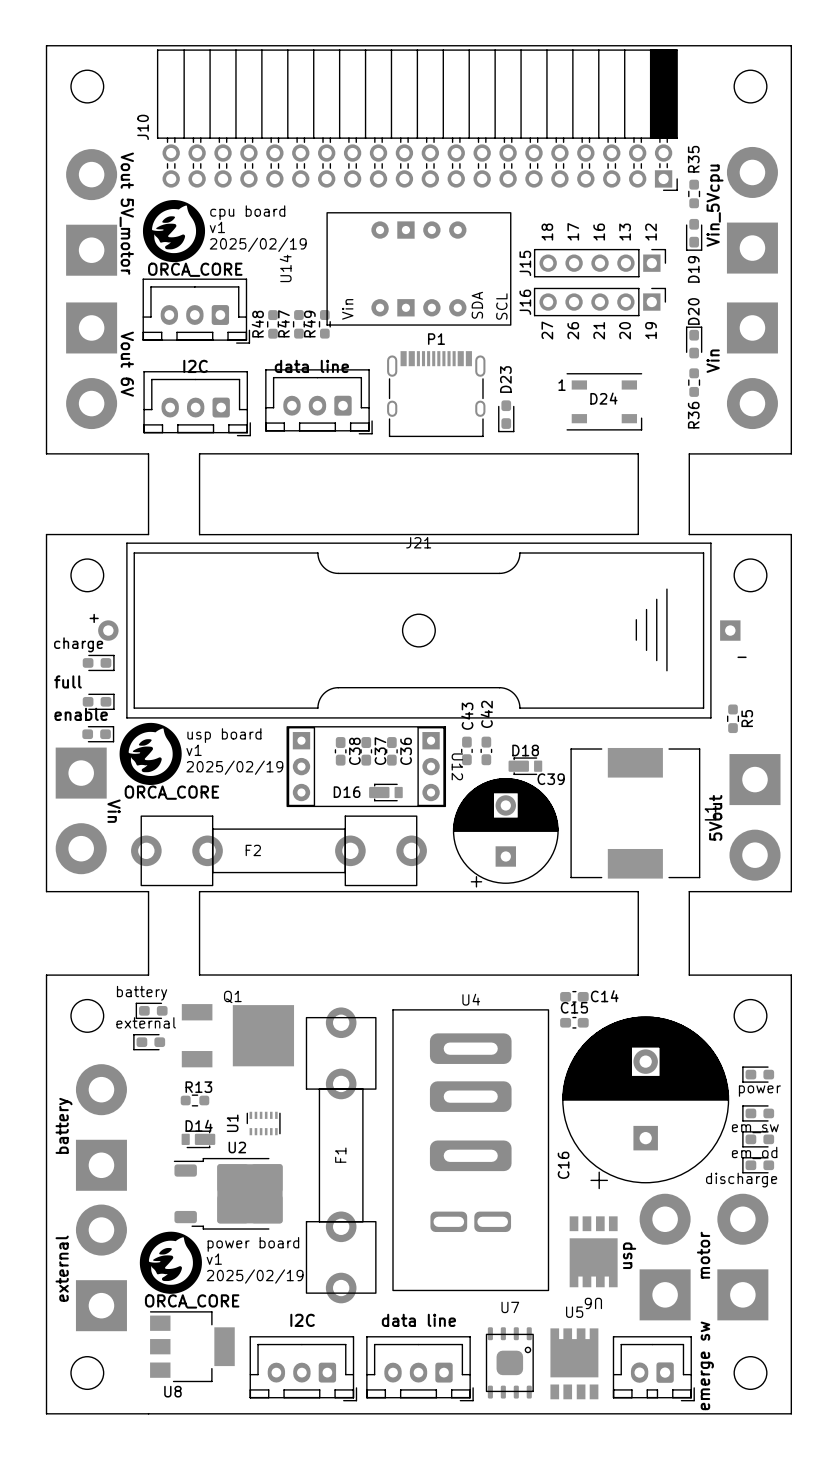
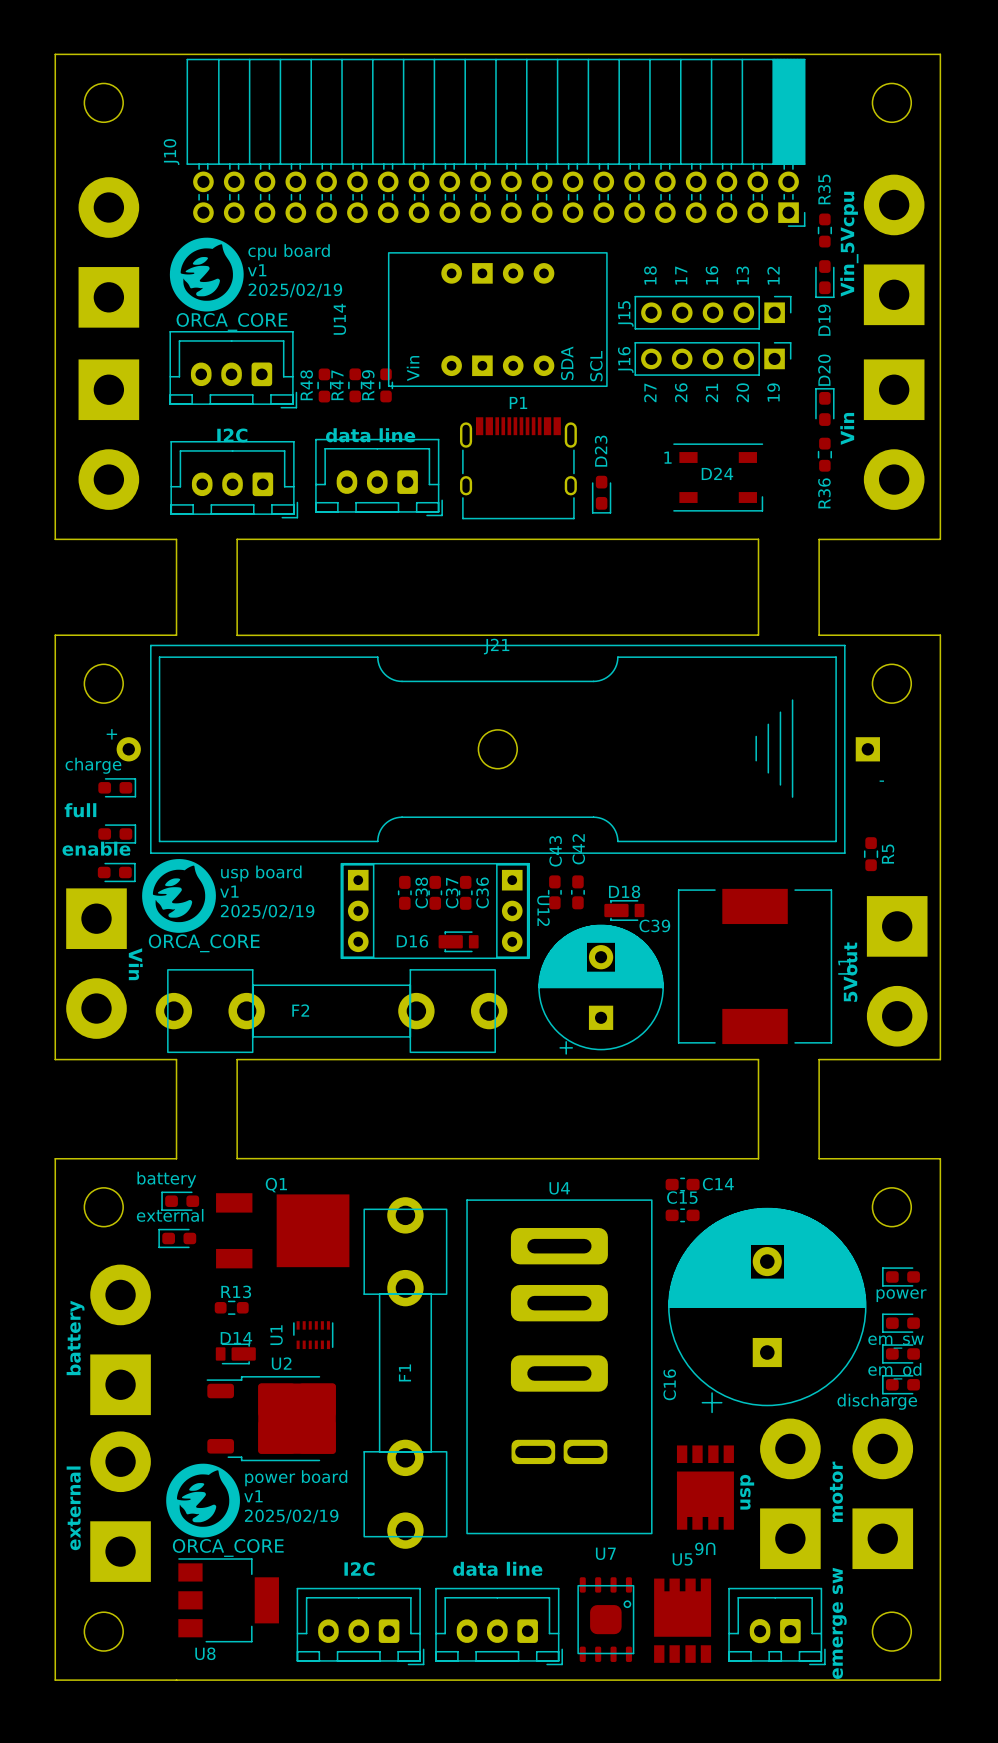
text: Vout 5V_motor (126, 213) -> none
text: Vout 6V (127, 364) -> none

